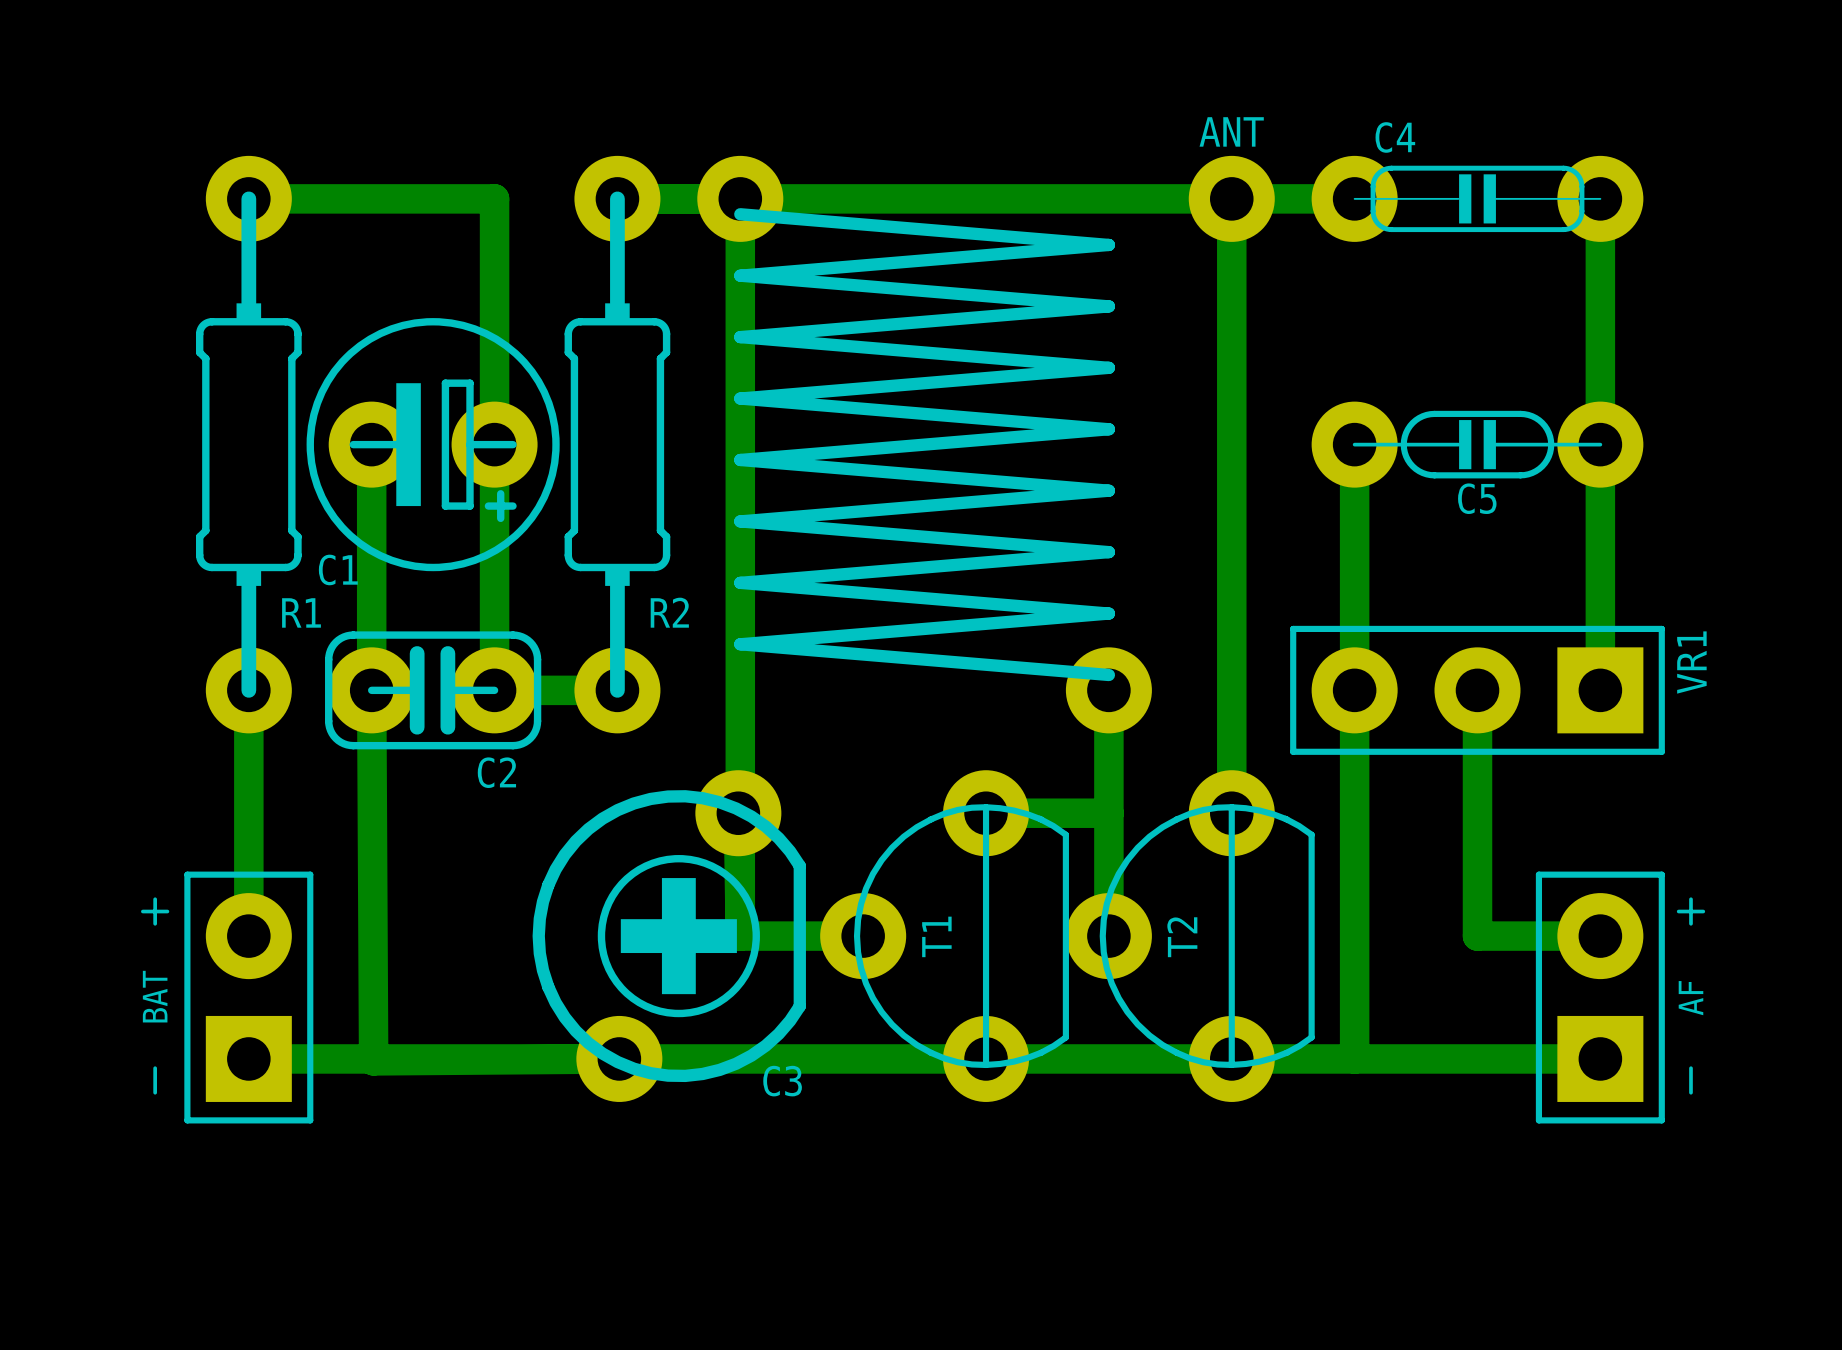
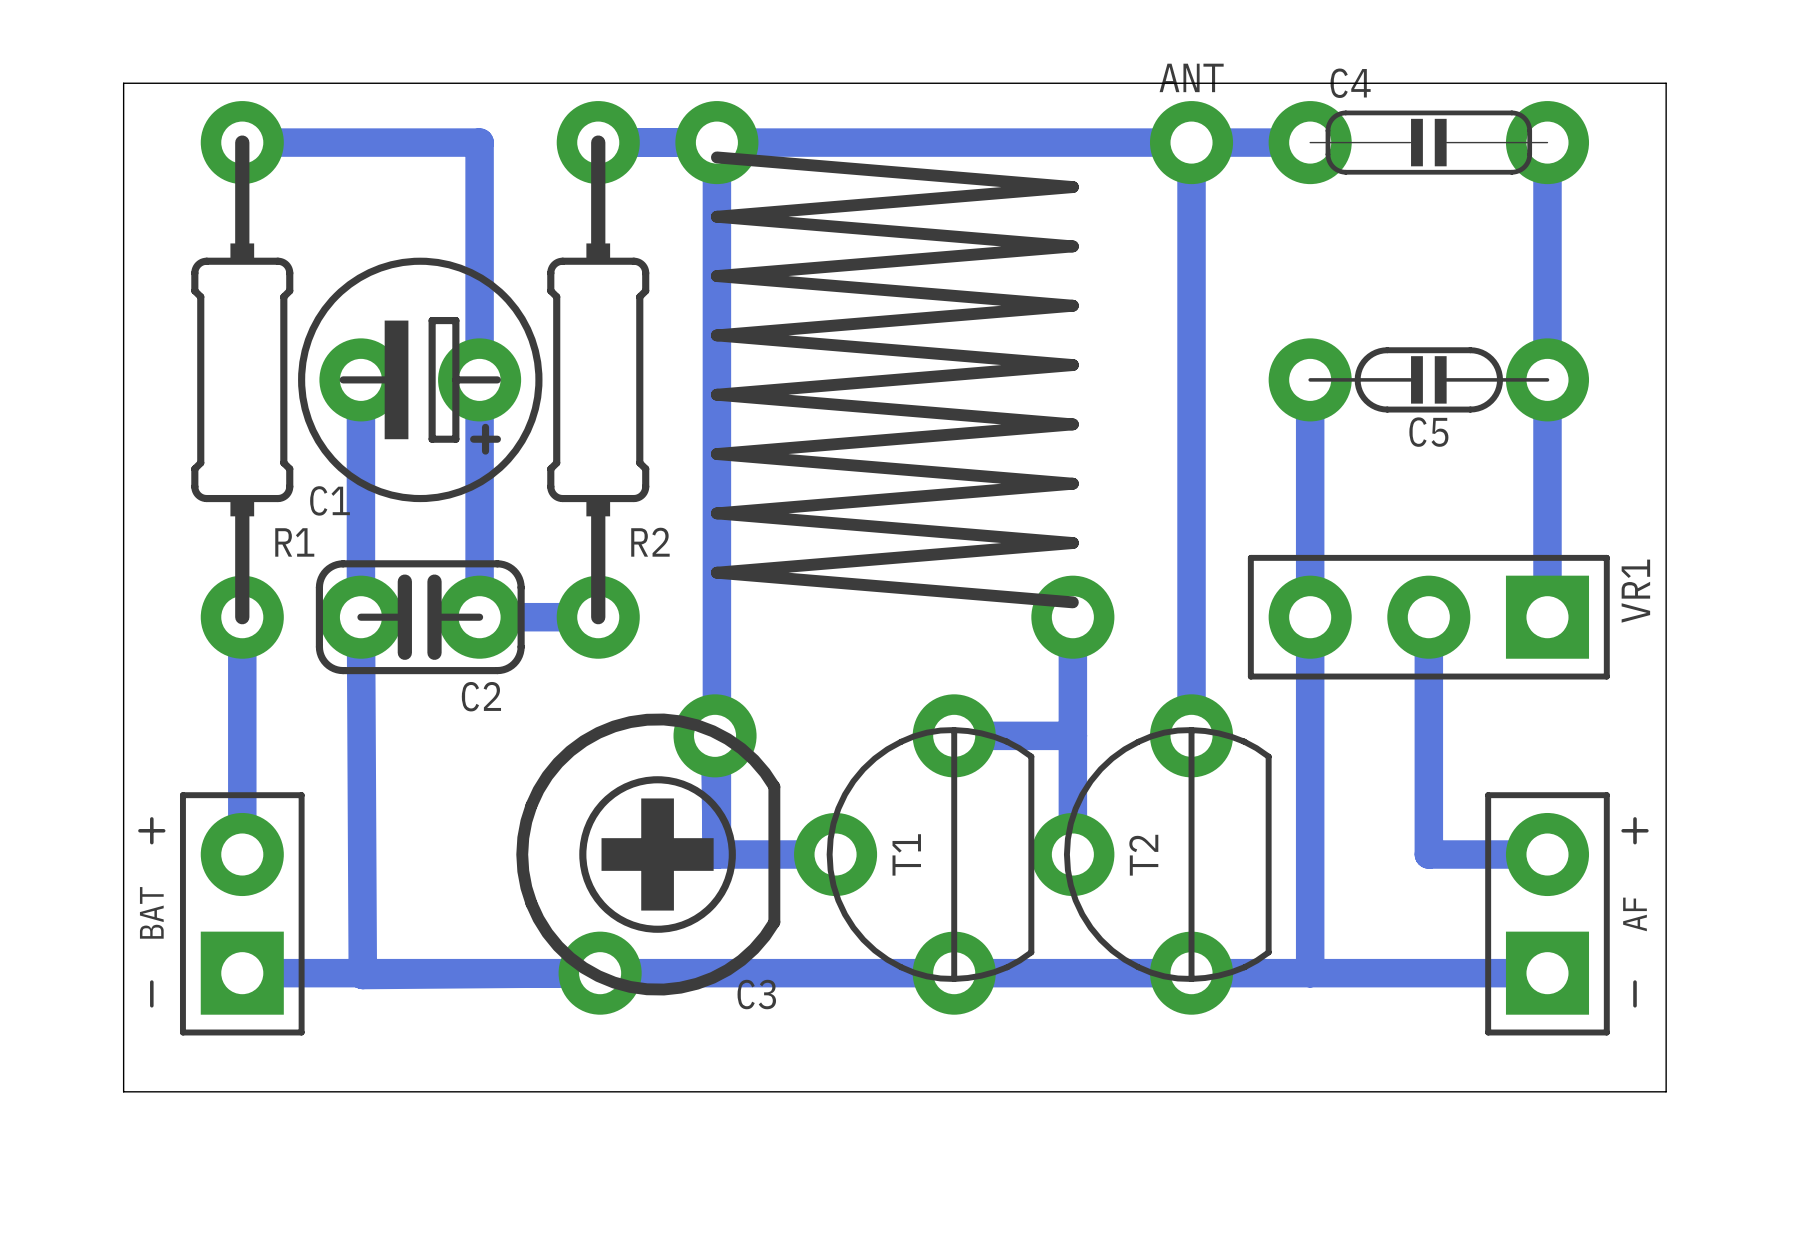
board edge: none -> (123, 83) (1666, 83) (1666, 1091) (123, 1091) (123, 83)

